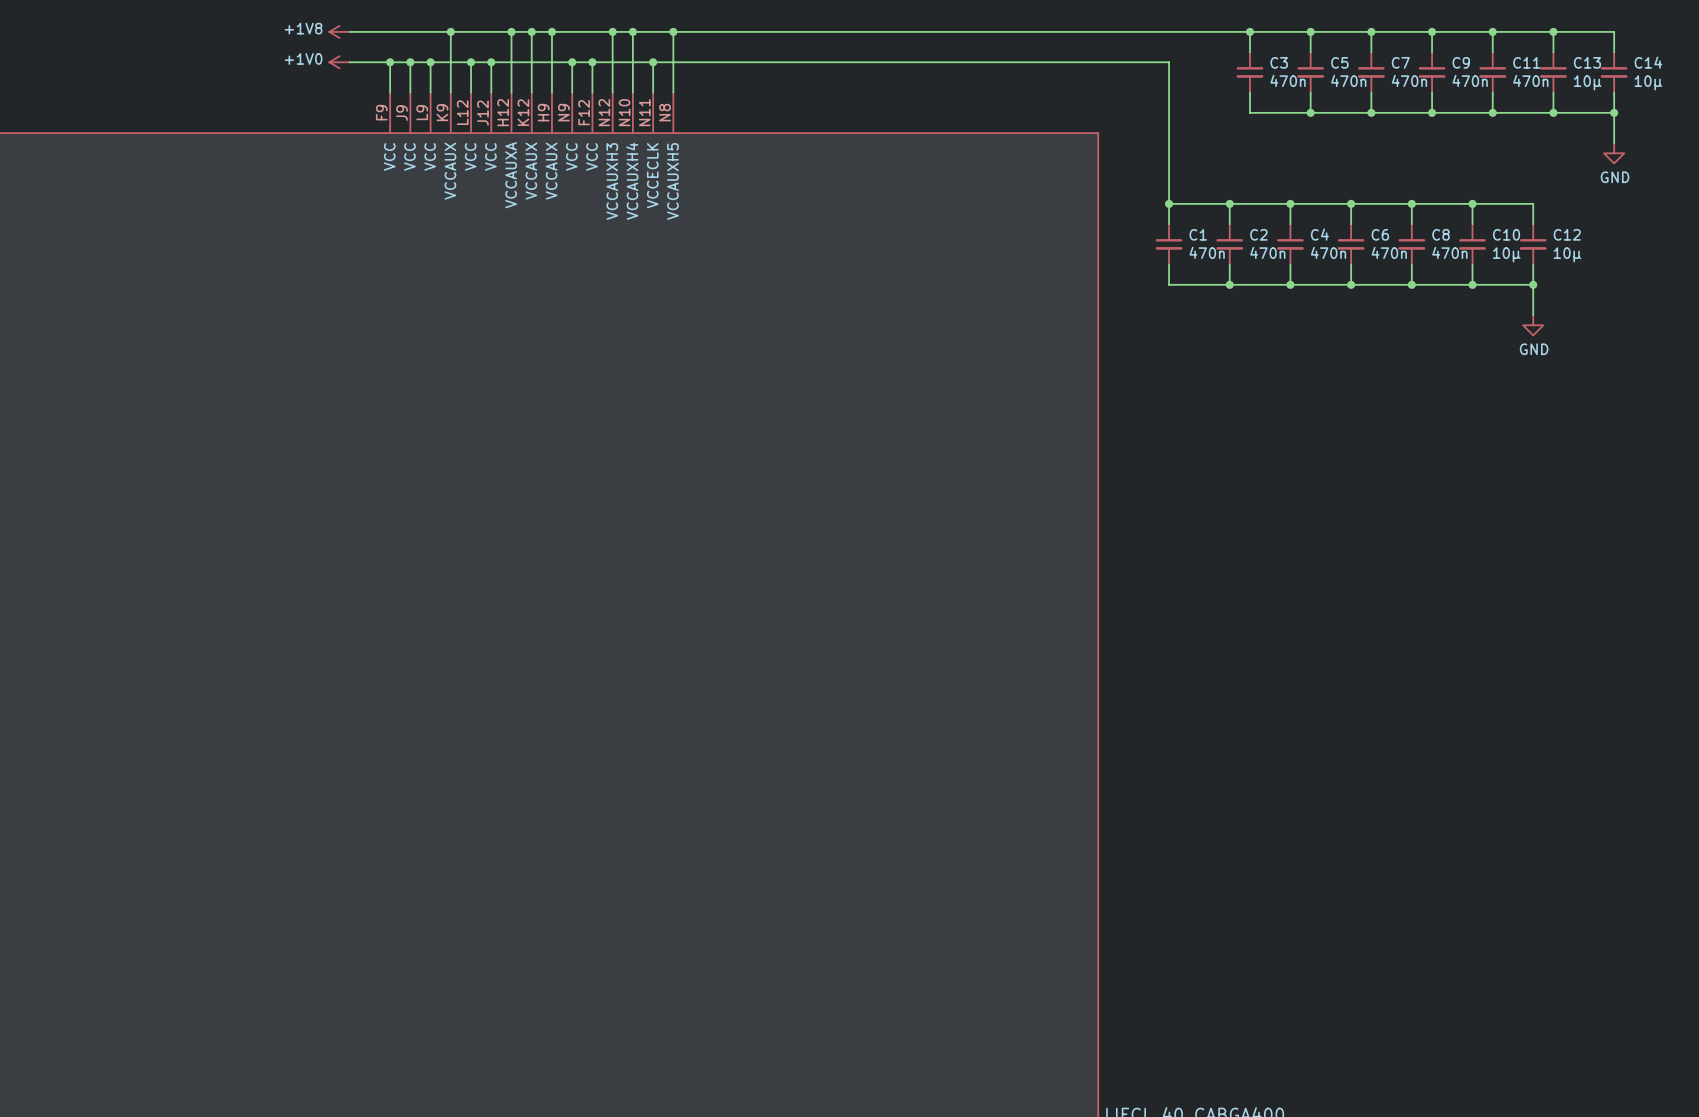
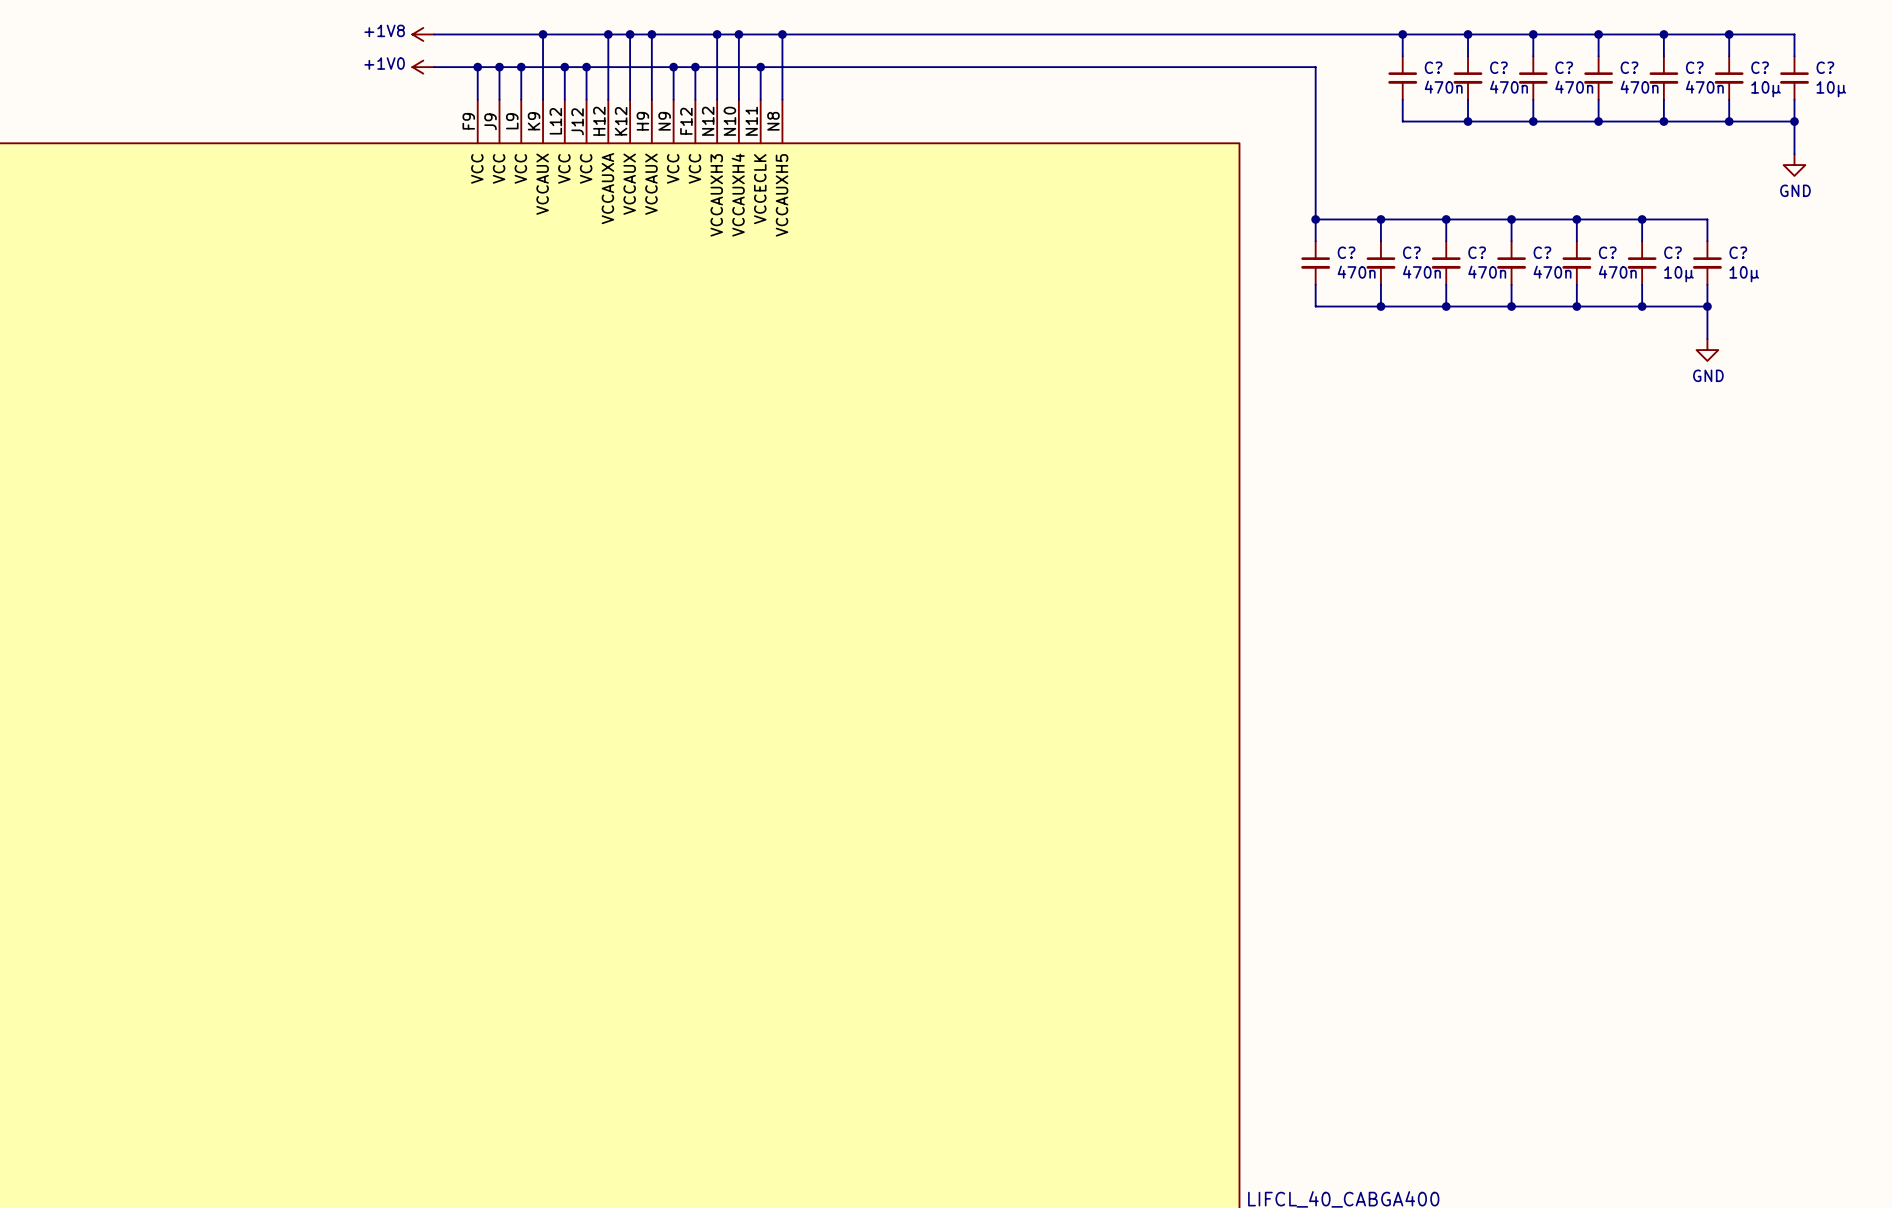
C3 name: C3 (1279, 62) -> C? (1433, 67)
C5 name: C5 (1339, 62) -> C? (1498, 67)
C7 name: C7 (1400, 62) -> C? (1564, 67)
C9 name: C9 (1461, 62) -> C? (1629, 67)
C11 name: C11 (1526, 62) -> C? (1694, 67)
C13 name: C13 (1587, 62) -> C? (1760, 67)
C14 name: C14 (1648, 62) -> C? (1825, 67)
C1 name: C1 (1198, 234) -> C? (1346, 252)
C2 name: C2 (1258, 234) -> C? (1411, 252)
C4 name: C4 (1319, 234) -> C? (1477, 252)
C6 name: C6 (1380, 234) -> C? (1542, 252)
C8 name: C8 (1441, 234) -> C? (1607, 252)
C10 name: C10 (1506, 234) -> C? (1673, 252)
C12 name: C12 (1567, 234) -> C? (1738, 252)

